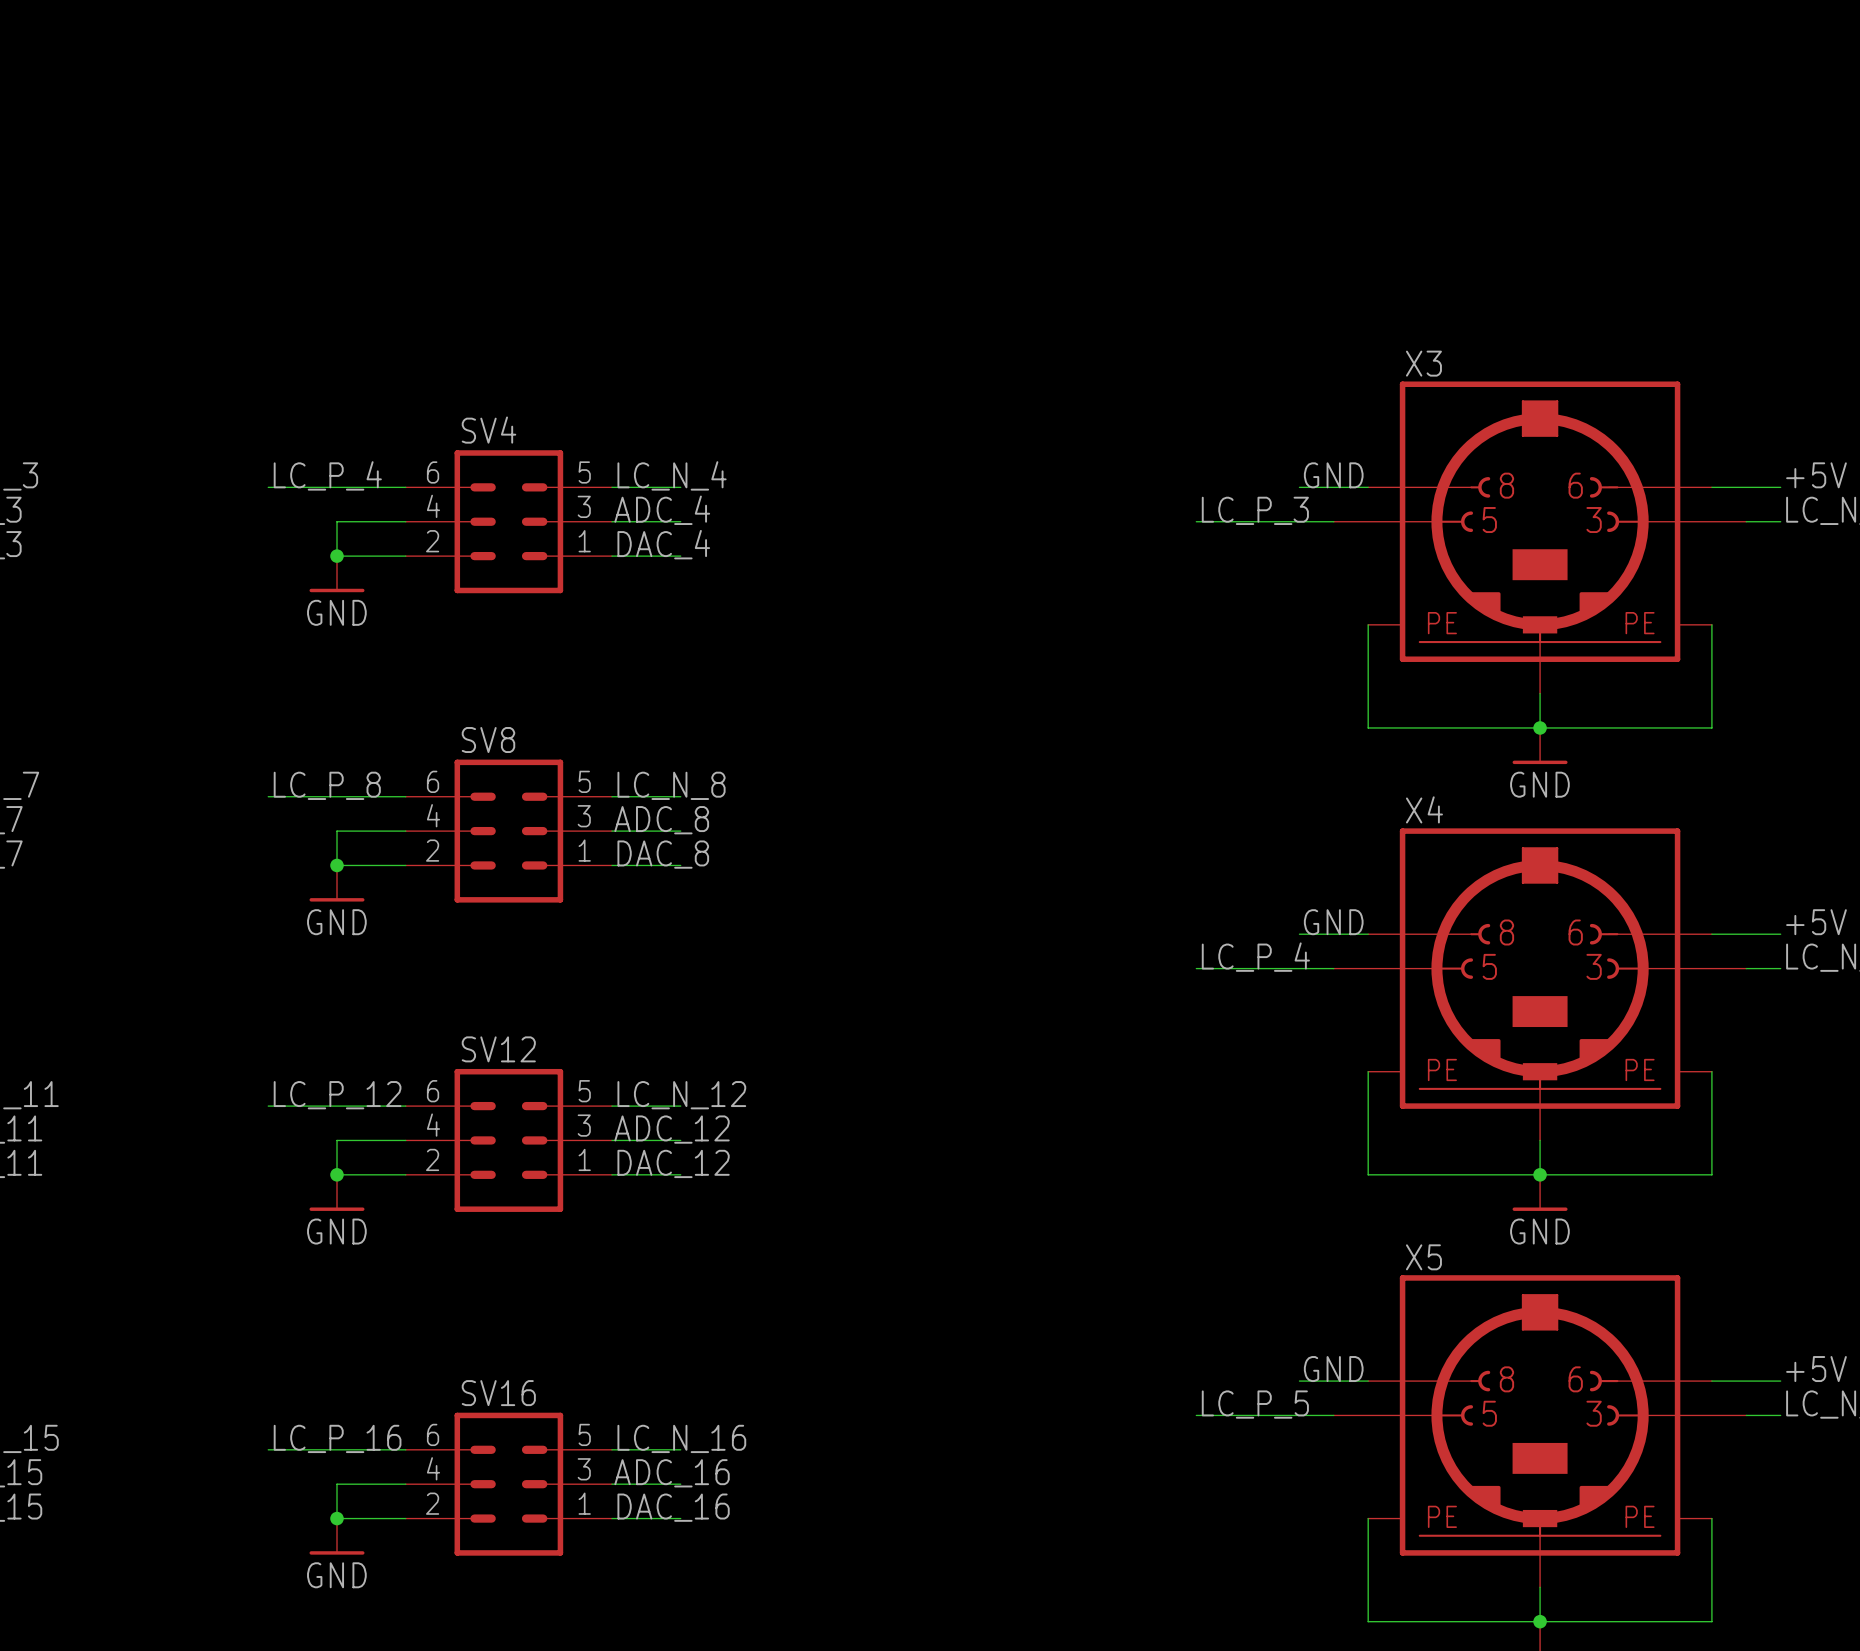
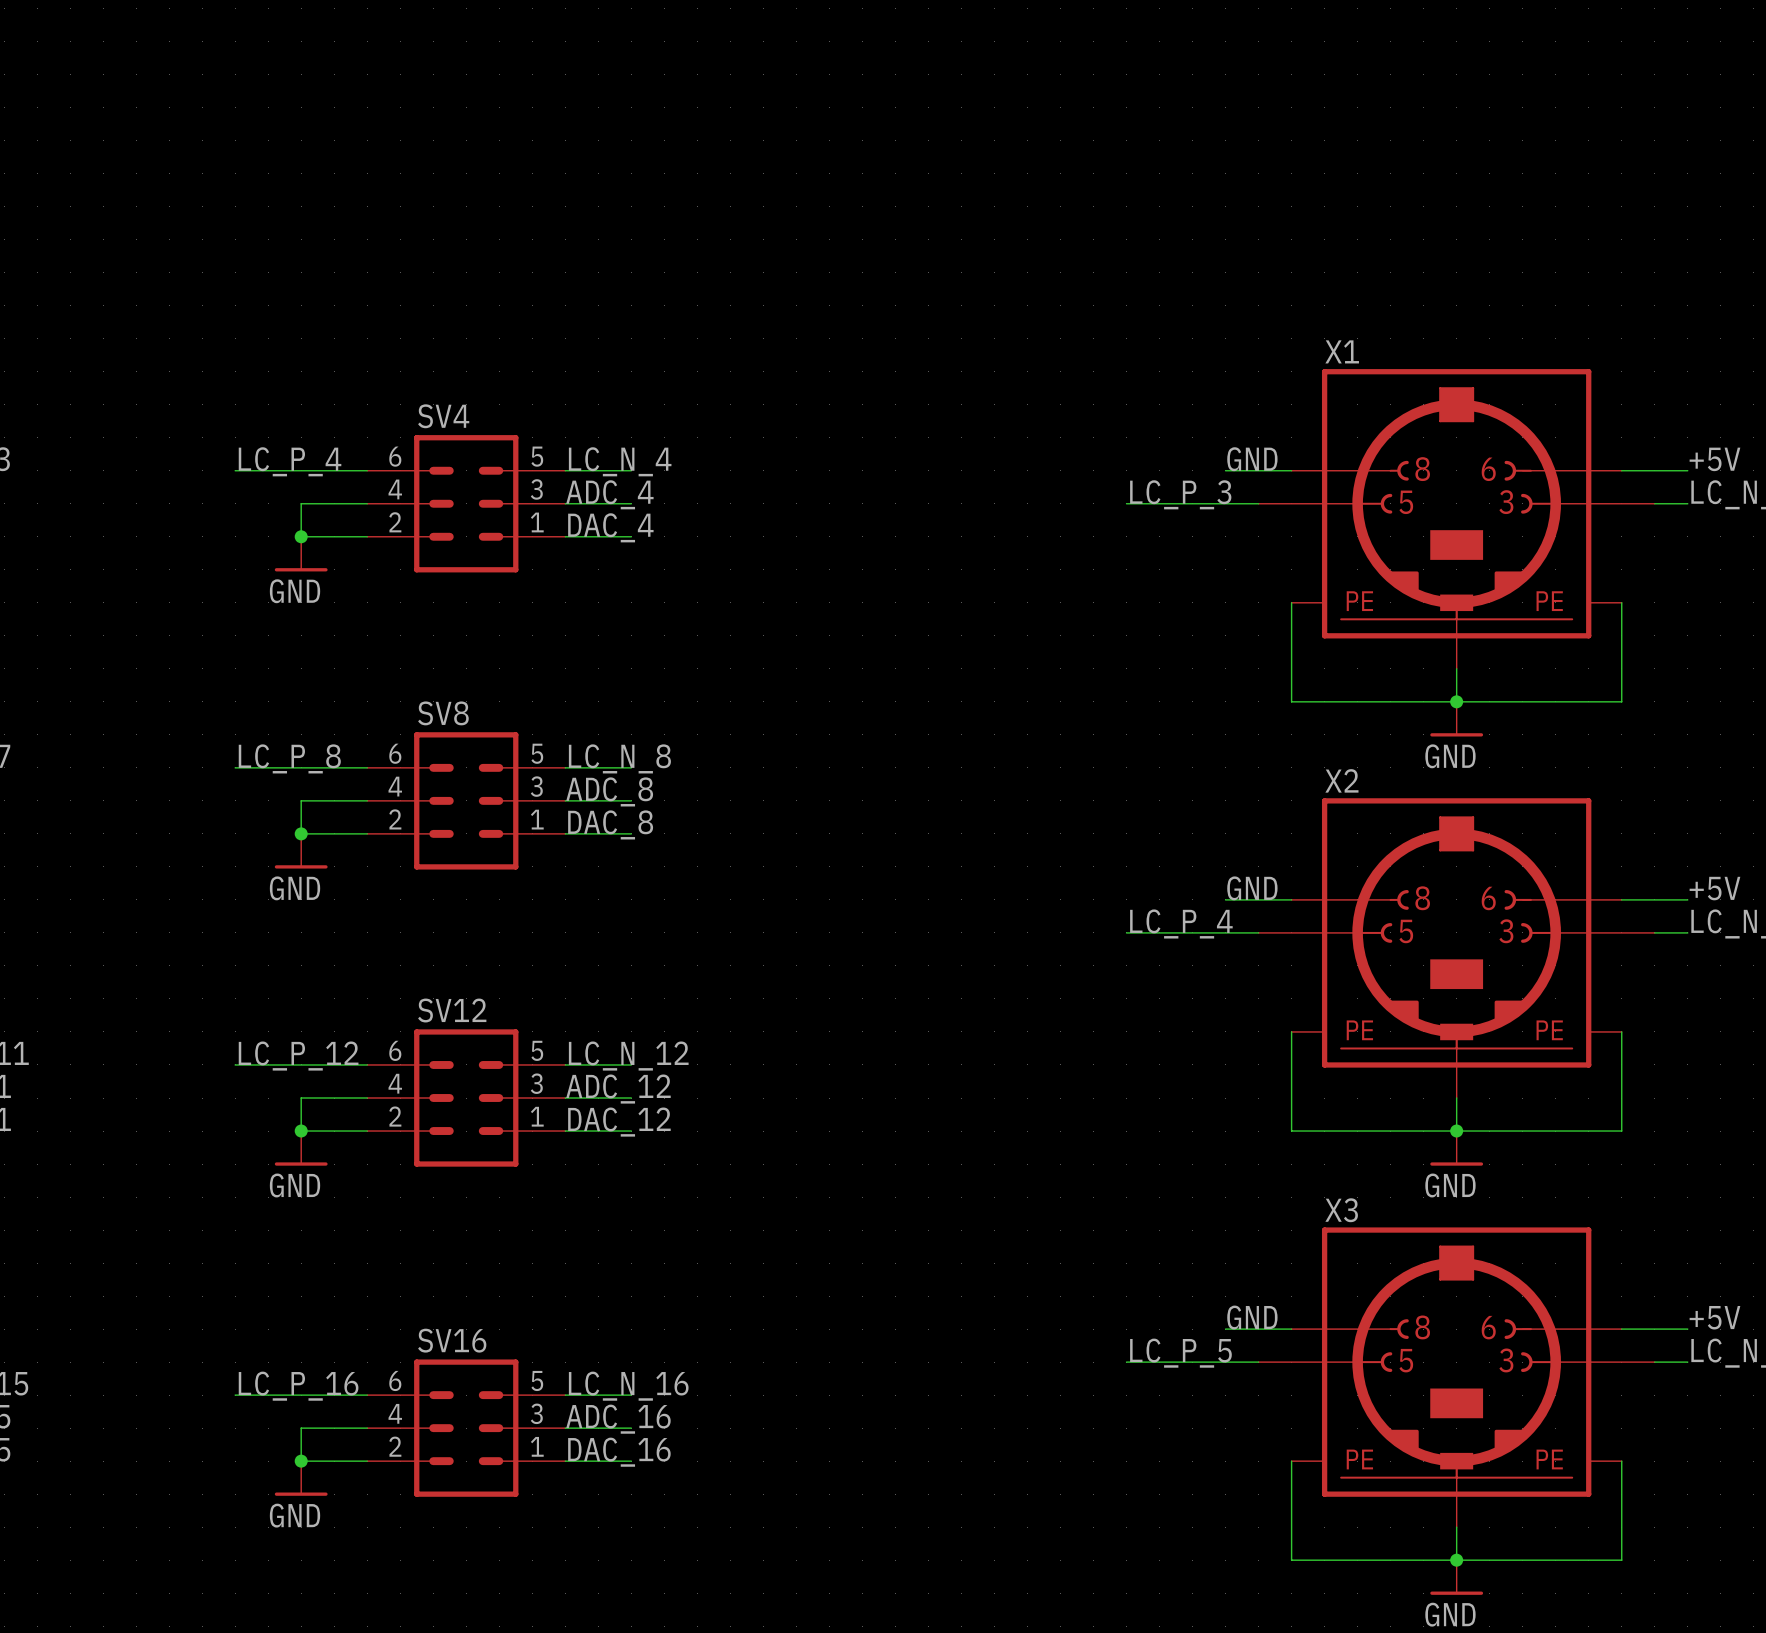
X3 name: X3 (1423, 363) -> X1 (1342, 351)
X4 name: X4 (1424, 809) -> X2 (1341, 780)
X5 name: X5 (1423, 1257) -> X3 (1341, 1210)

